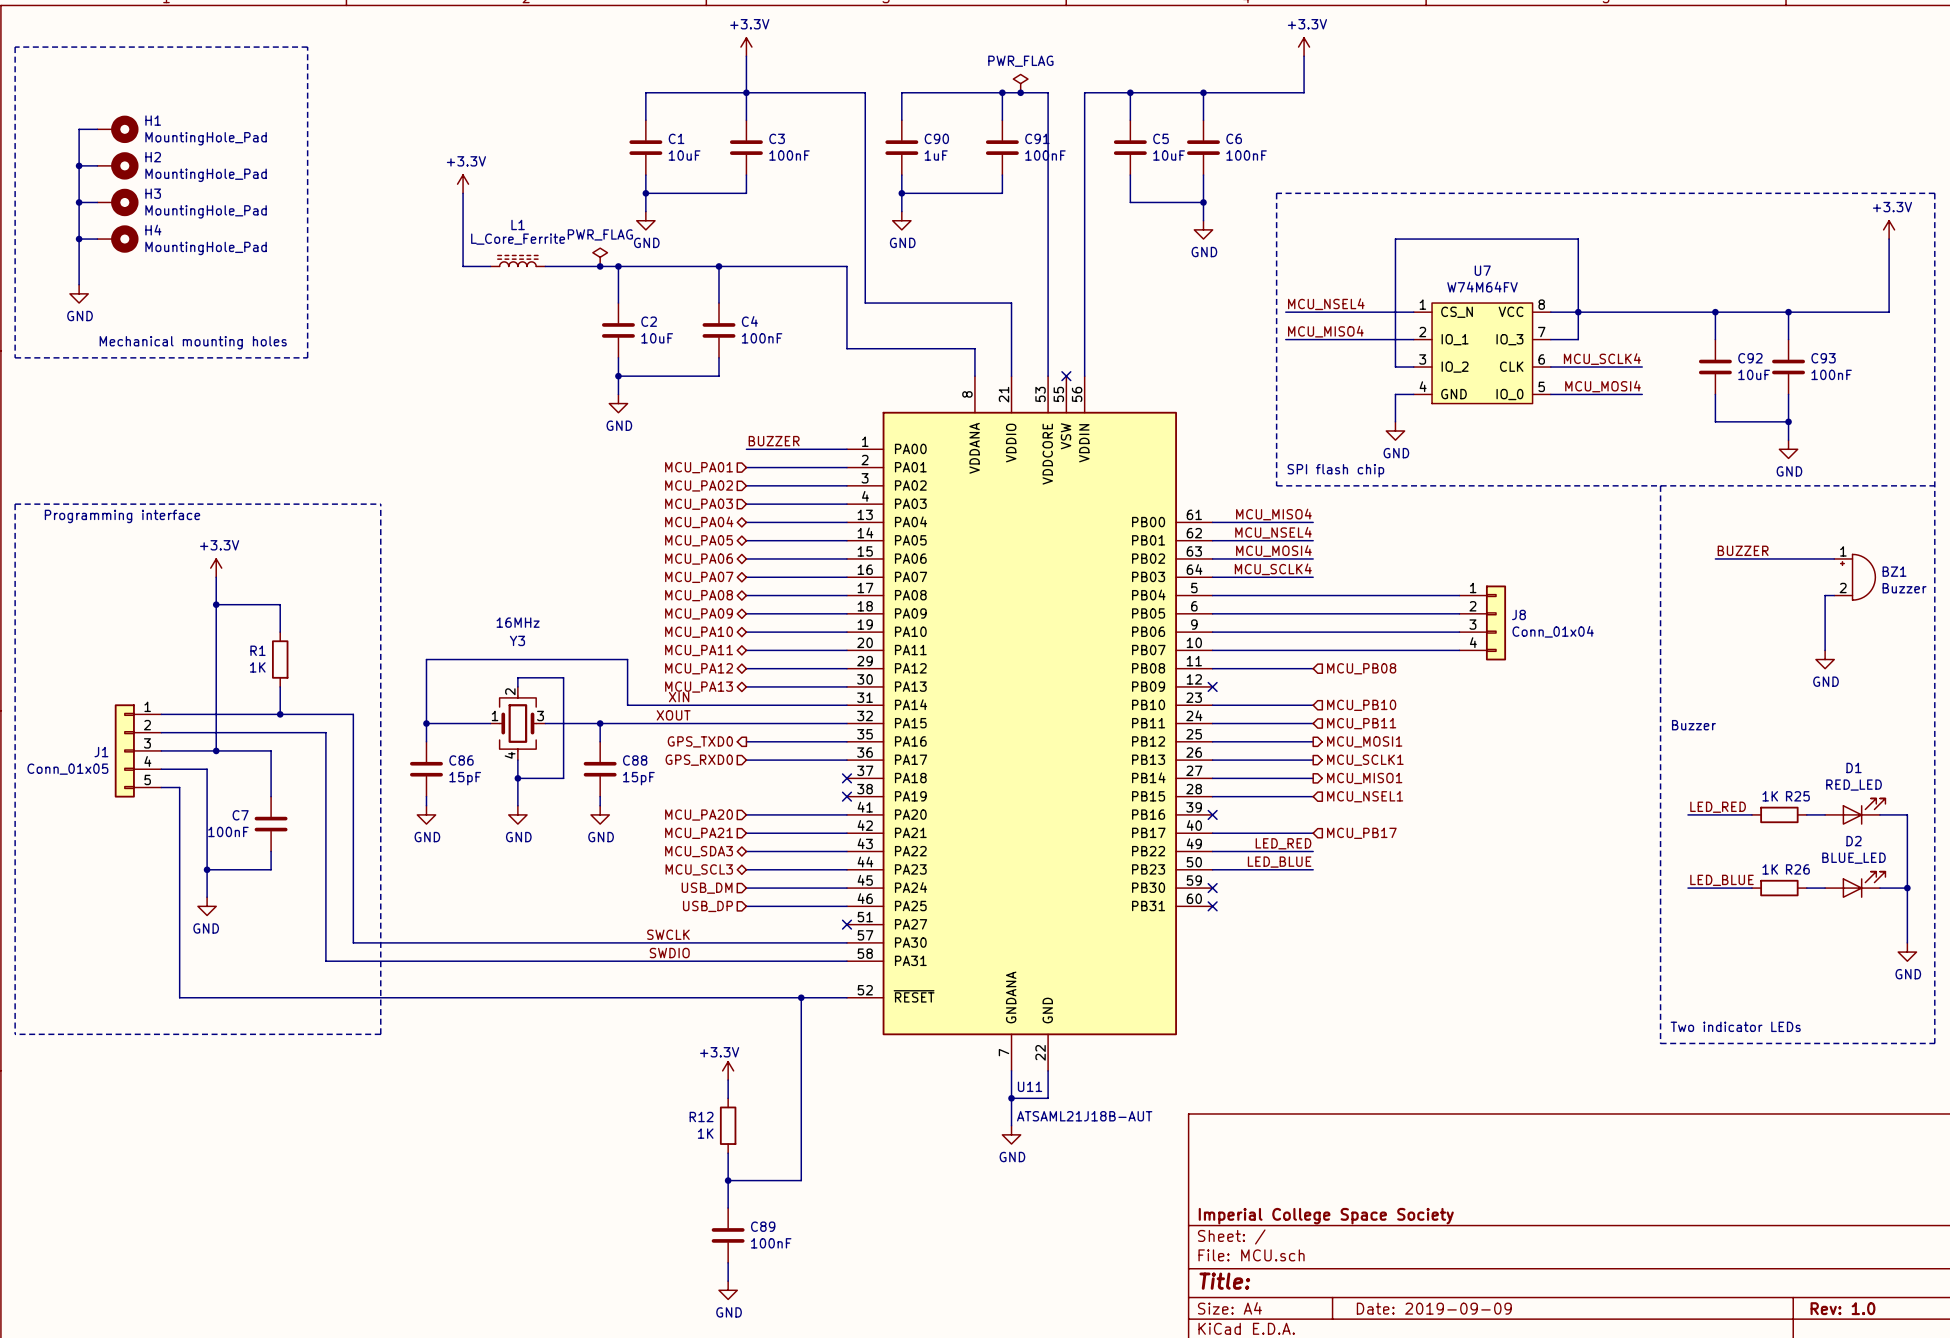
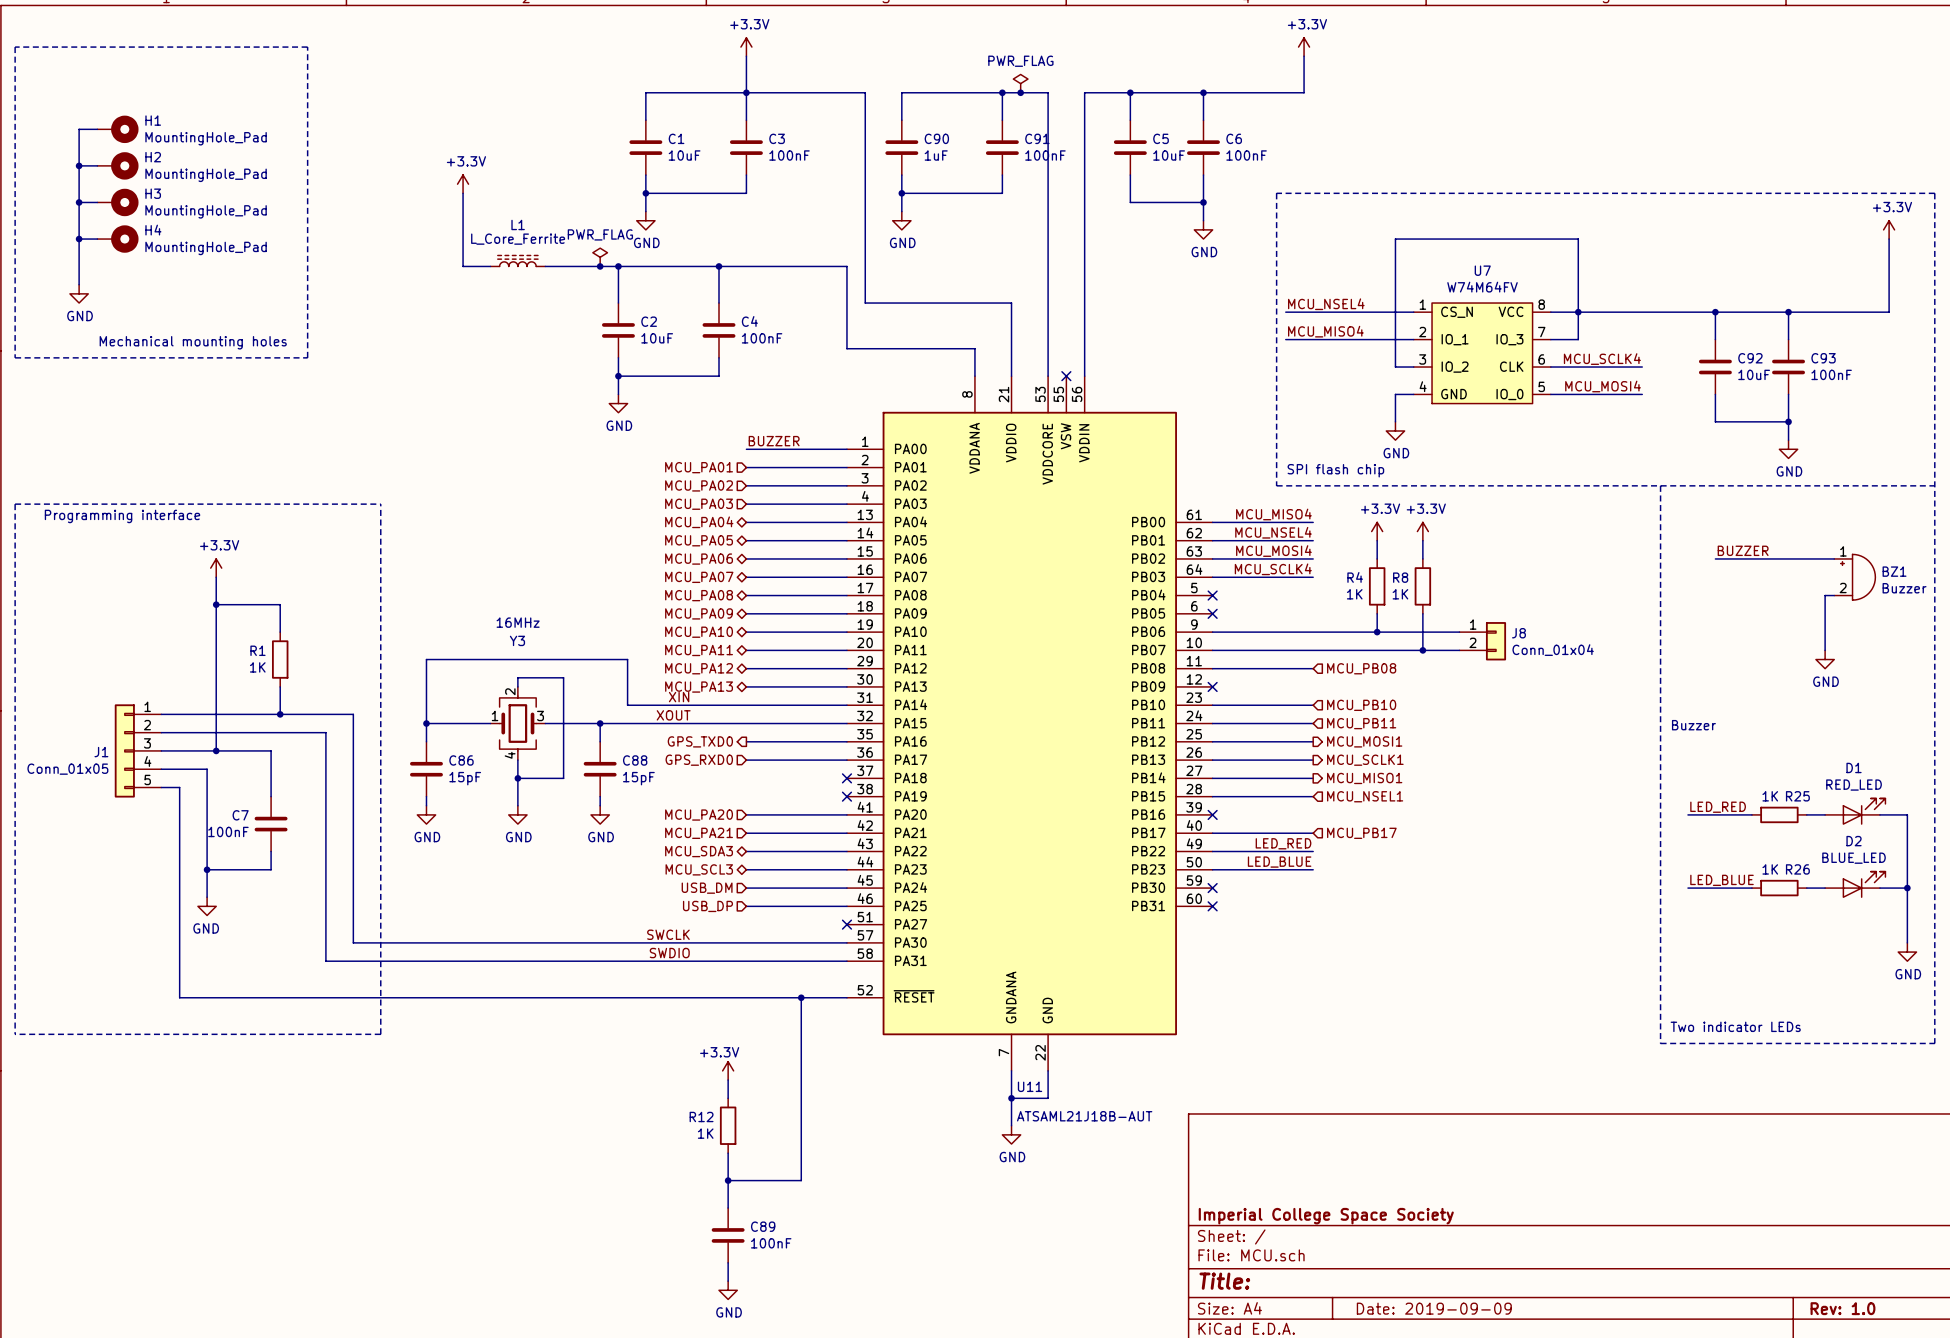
power symbol: none -> +3.3V (1377, 531)
power symbol: none -> +3.3V (1422, 531)
wire: none -> (1377, 540) (1377, 558)
wire: none -> (1422, 540) (1422, 558)
J8 symbol: [1459, 585, 1507, 661] -> [1459, 622, 1507, 661]
R4: none -> 1K (1377, 586)
R8: none -> 1K (1422, 586)
wire: (1212, 595) (1459, 595) -> none
no-connect mark: none -> (1212, 595)
wire: (1212, 613) (1459, 613) -> none
no-connect mark: none -> (1212, 613)
wire: none -> (1377, 613) (1377, 632)
wire: none -> (1422, 613) (1422, 650)
junction: none -> (1377, 632)
junction: none -> (1422, 650)

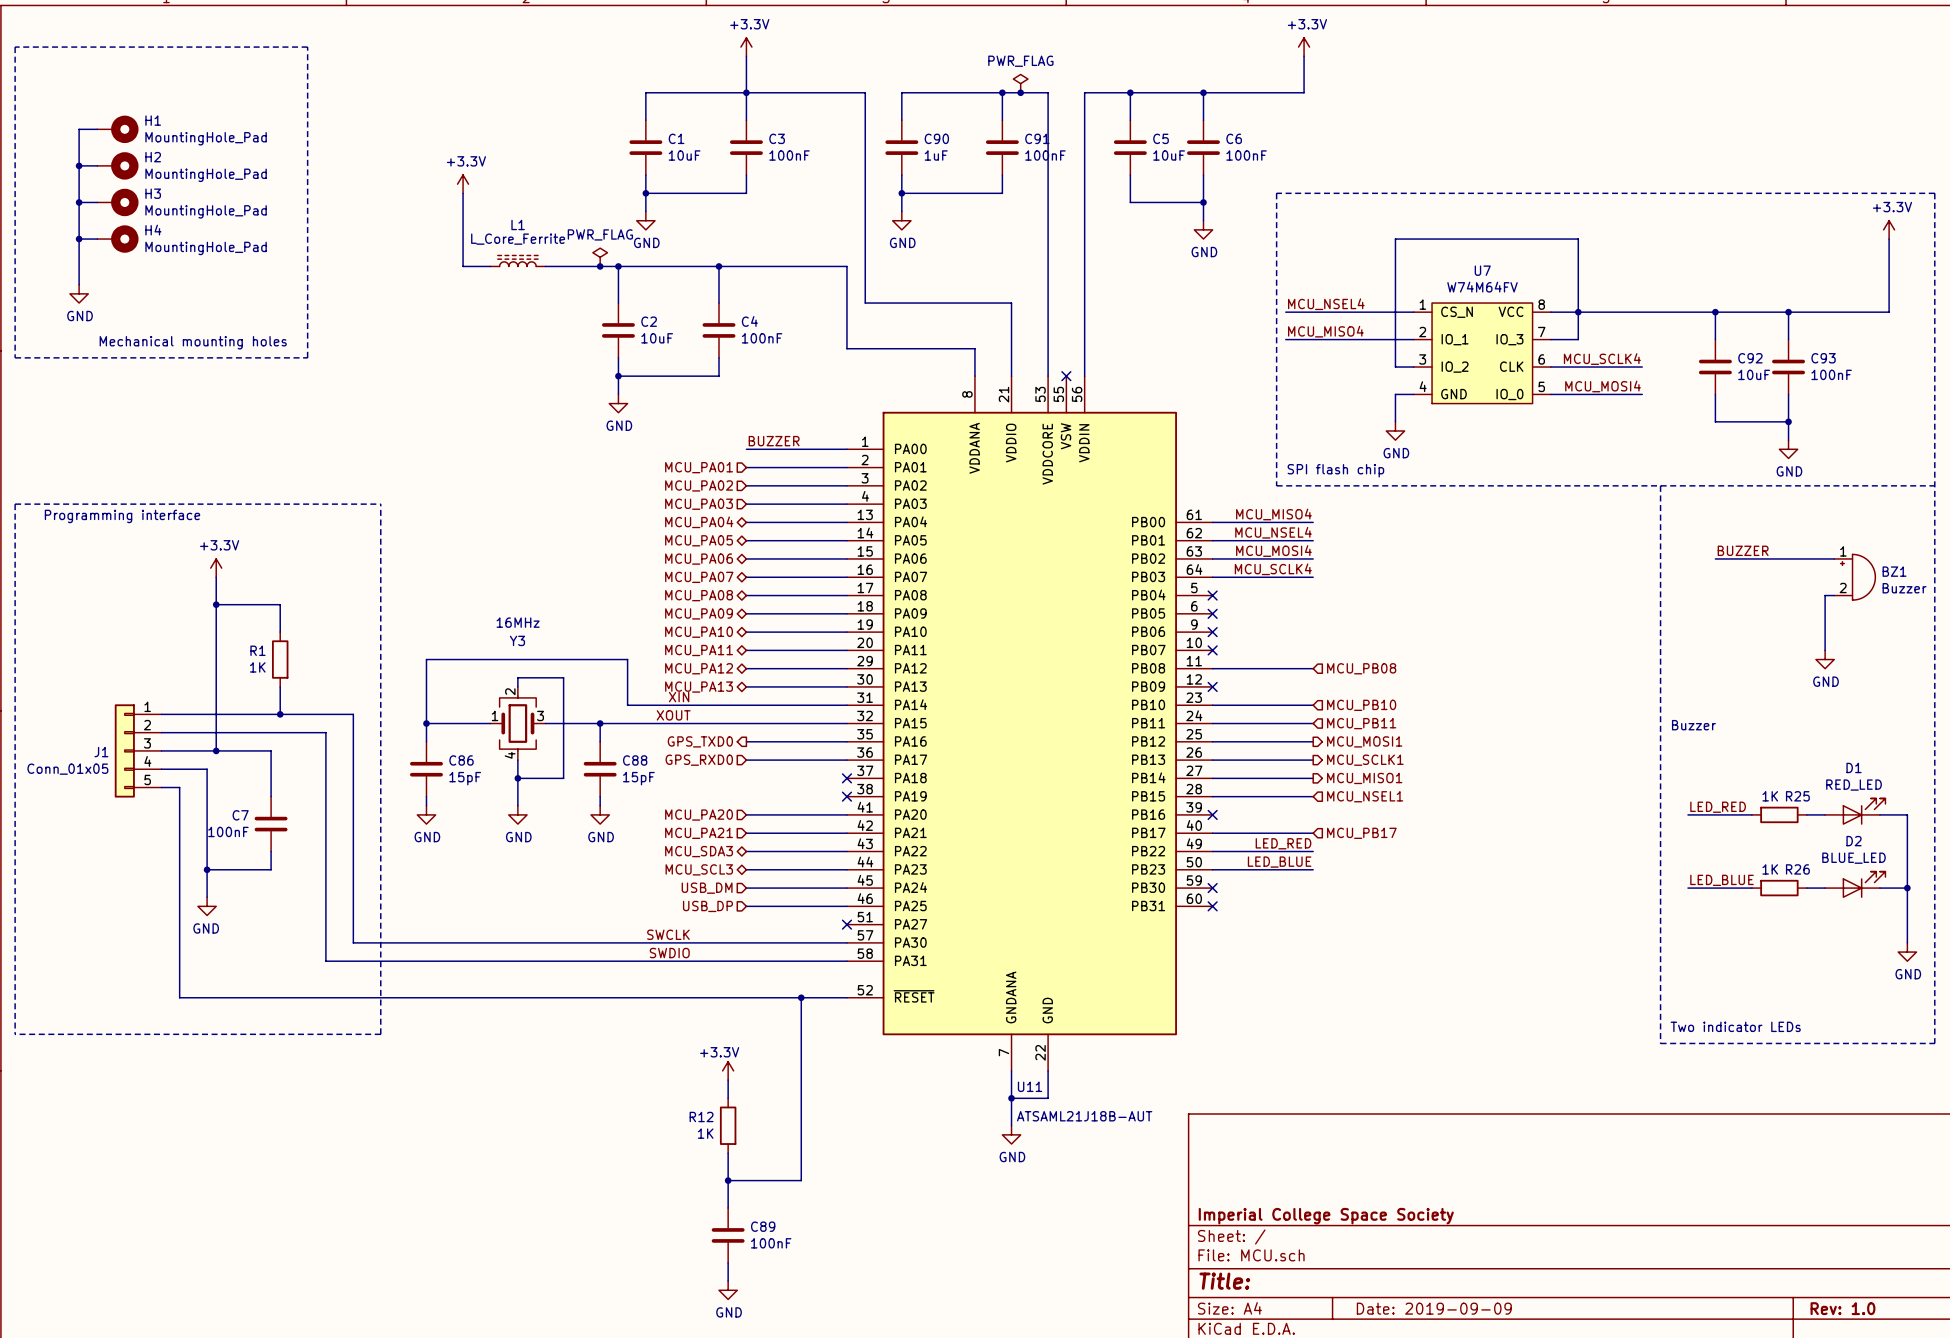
power symbol: +3.3V (1377, 531) -> none
power symbol: +3.3V (1422, 531) -> none
wire: (1377, 540) (1377, 558) -> none
wire: (1422, 540) (1422, 558) -> none
R4: 1K (1377, 586) -> none
R8: 1K (1422, 586) -> none
wire: (1377, 613) (1377, 632) -> none
wire: (1422, 613) (1422, 650) -> none
wire: (1212, 632) (1459, 632) -> none
no-connect mark: none -> (1212, 632)
junction: (1377, 632) -> none
J8: Conn_01x04 (1482, 641) -> none
wire: (1212, 650) (1459, 650) -> none
no-connect mark: none -> (1212, 650)
junction: (1422, 650) -> none

